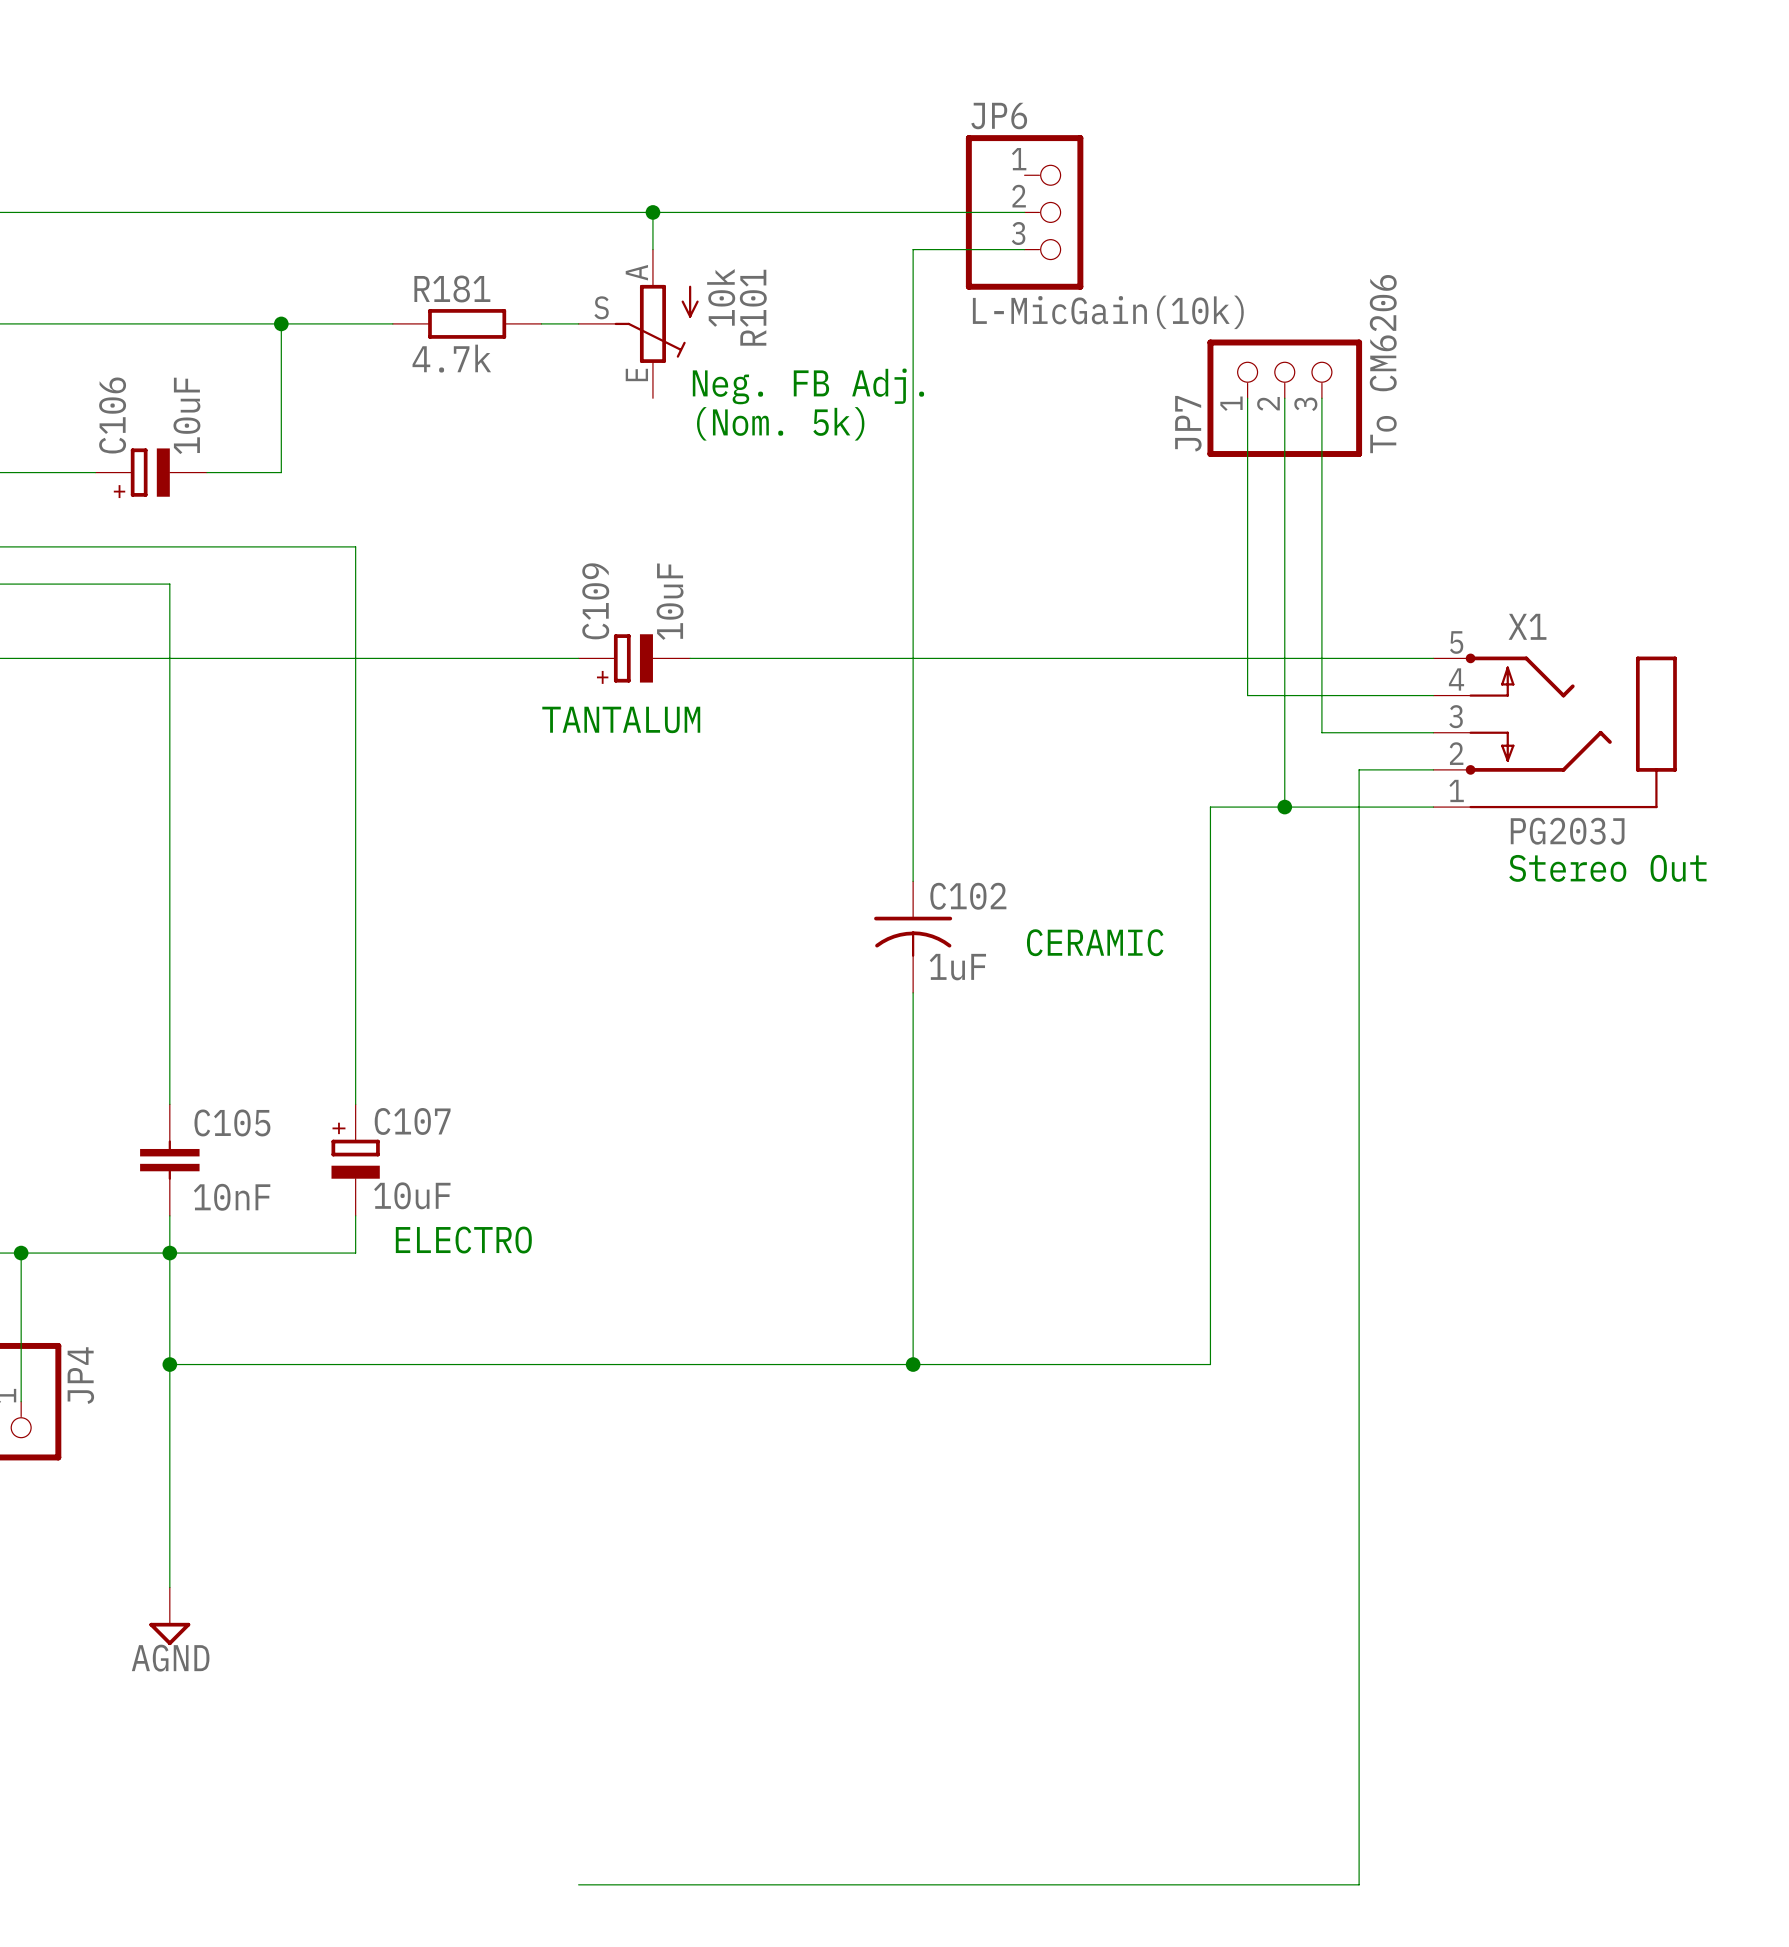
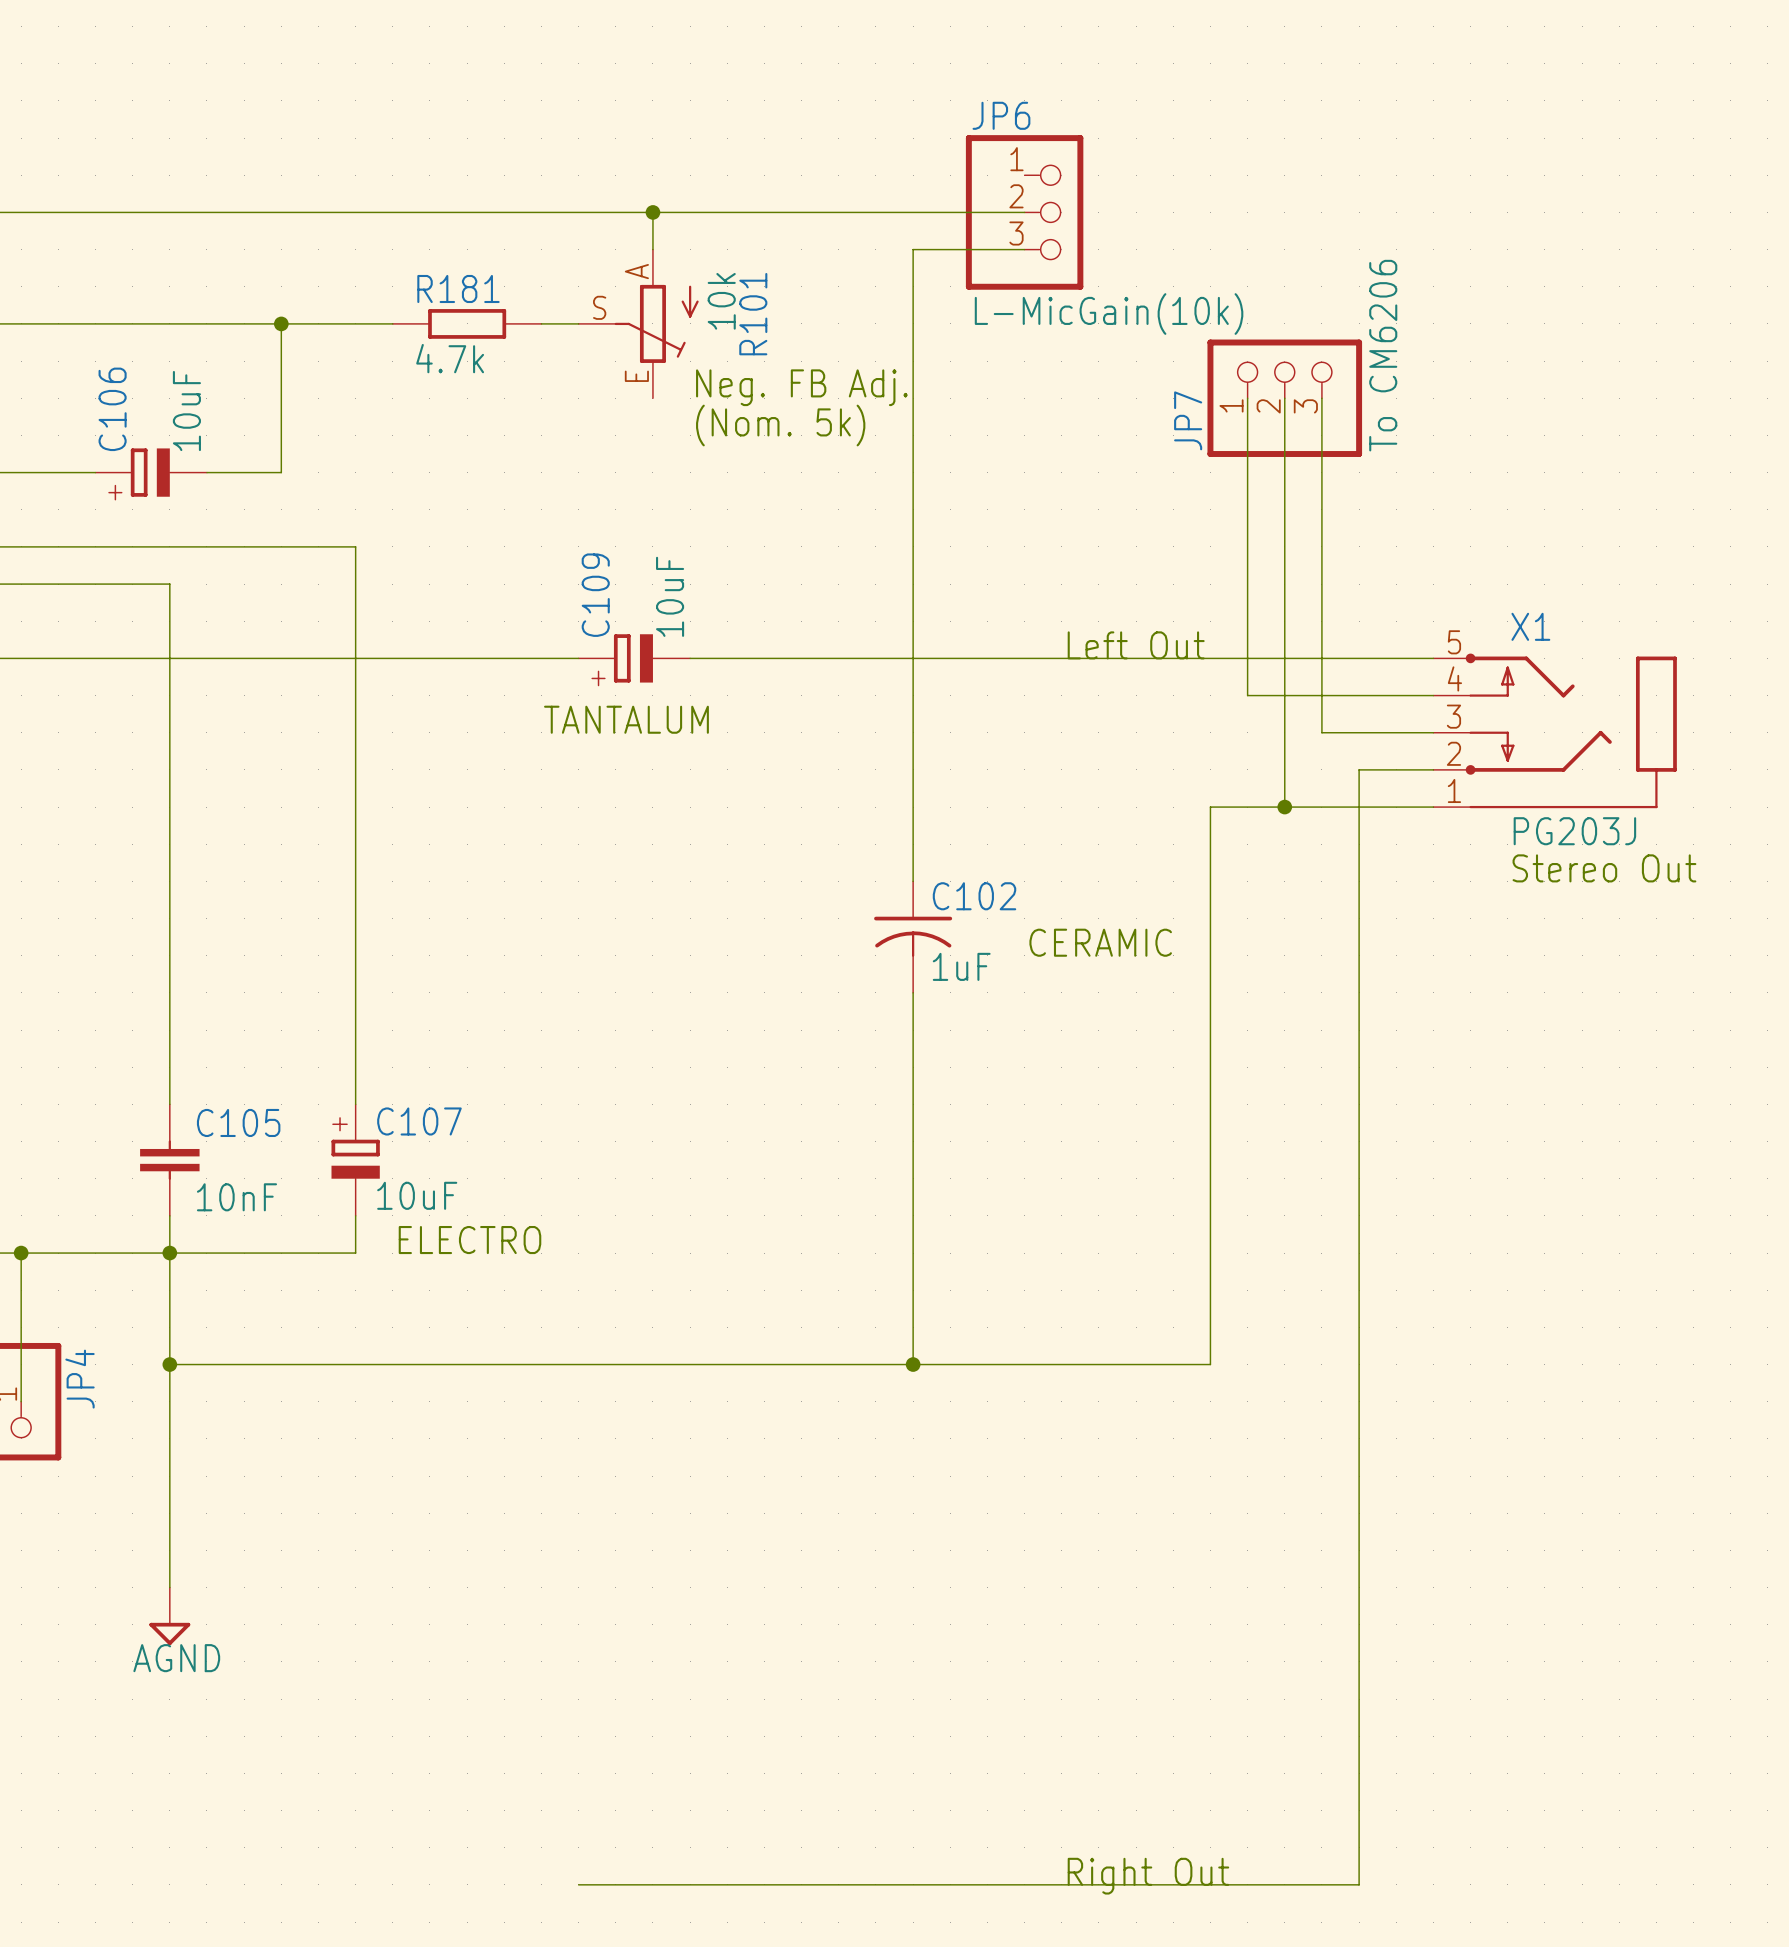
text: none -> Left Out (1136, 645)
text: none -> Right Out (1148, 1876)

